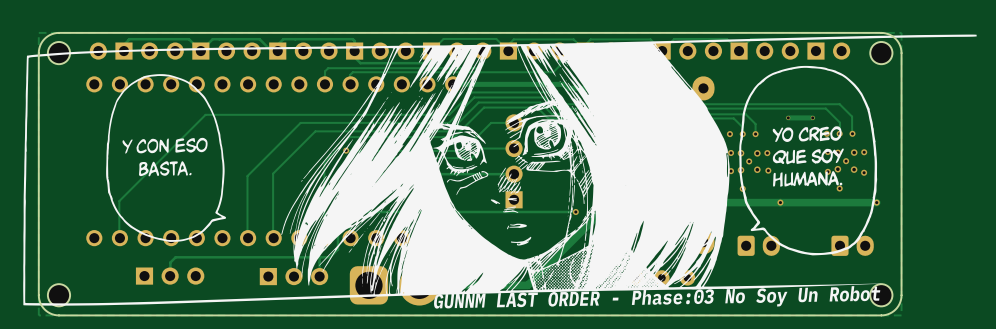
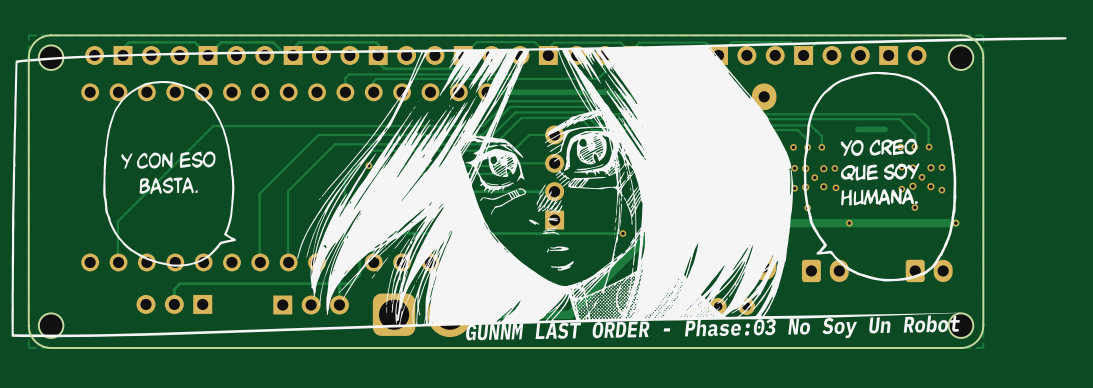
via: (788, 117) -> none
via: (812, 117) -> none
part rotation: 0° (170, 276) -> 180° (174, 304)

